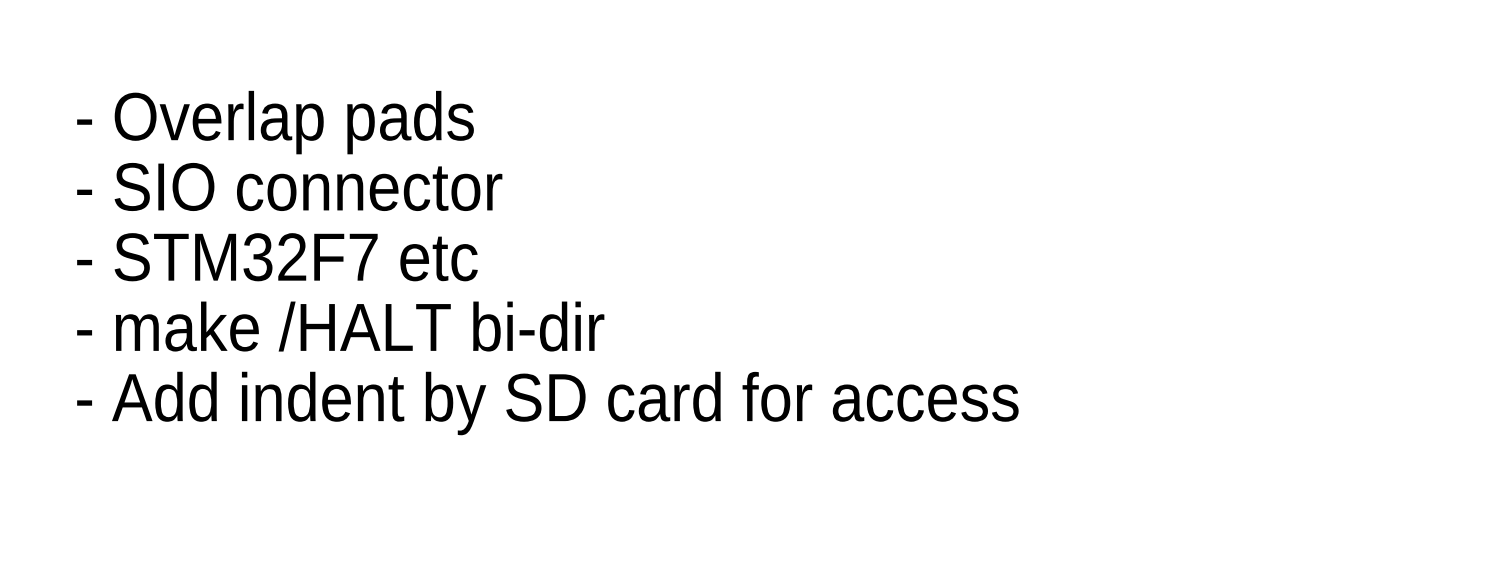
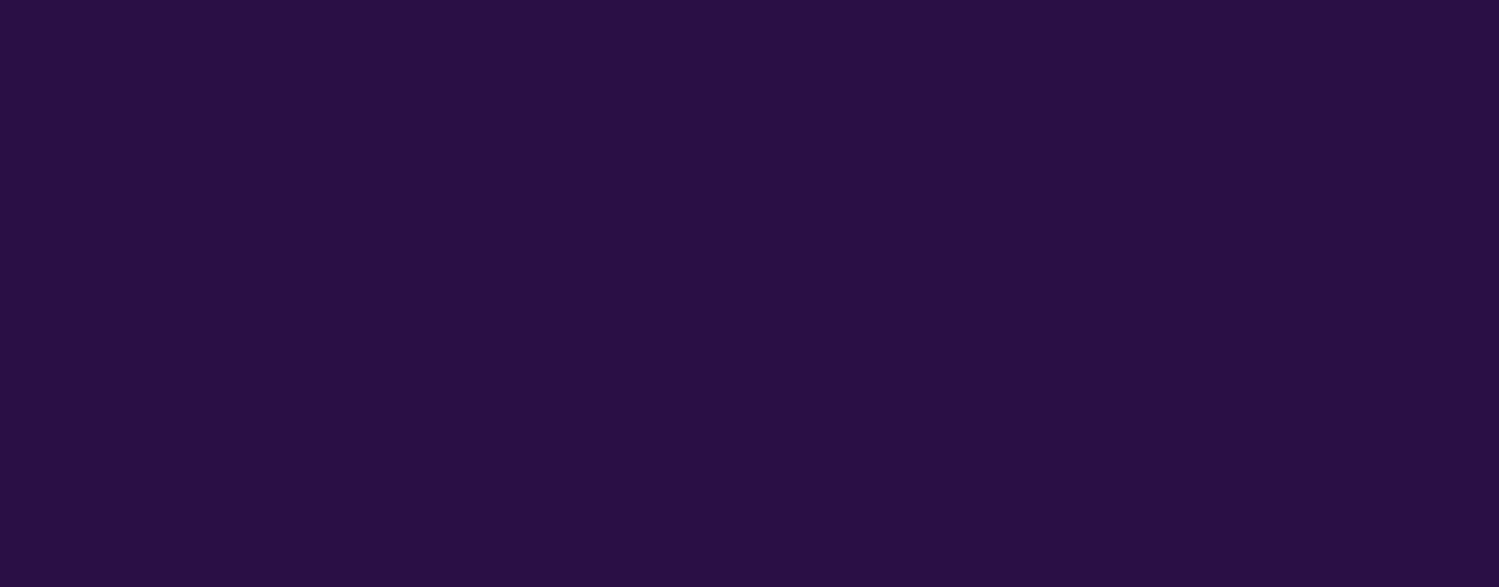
text: - Overlap pads (275, 122) -> none
text: - SIO connector (289, 186) -> none
text: - STM32F7 etc (277, 257) -> none
text: - make /HALT bi-dir (340, 326) -> none
text: - Add indent by SD card for access (547, 403) -> none

